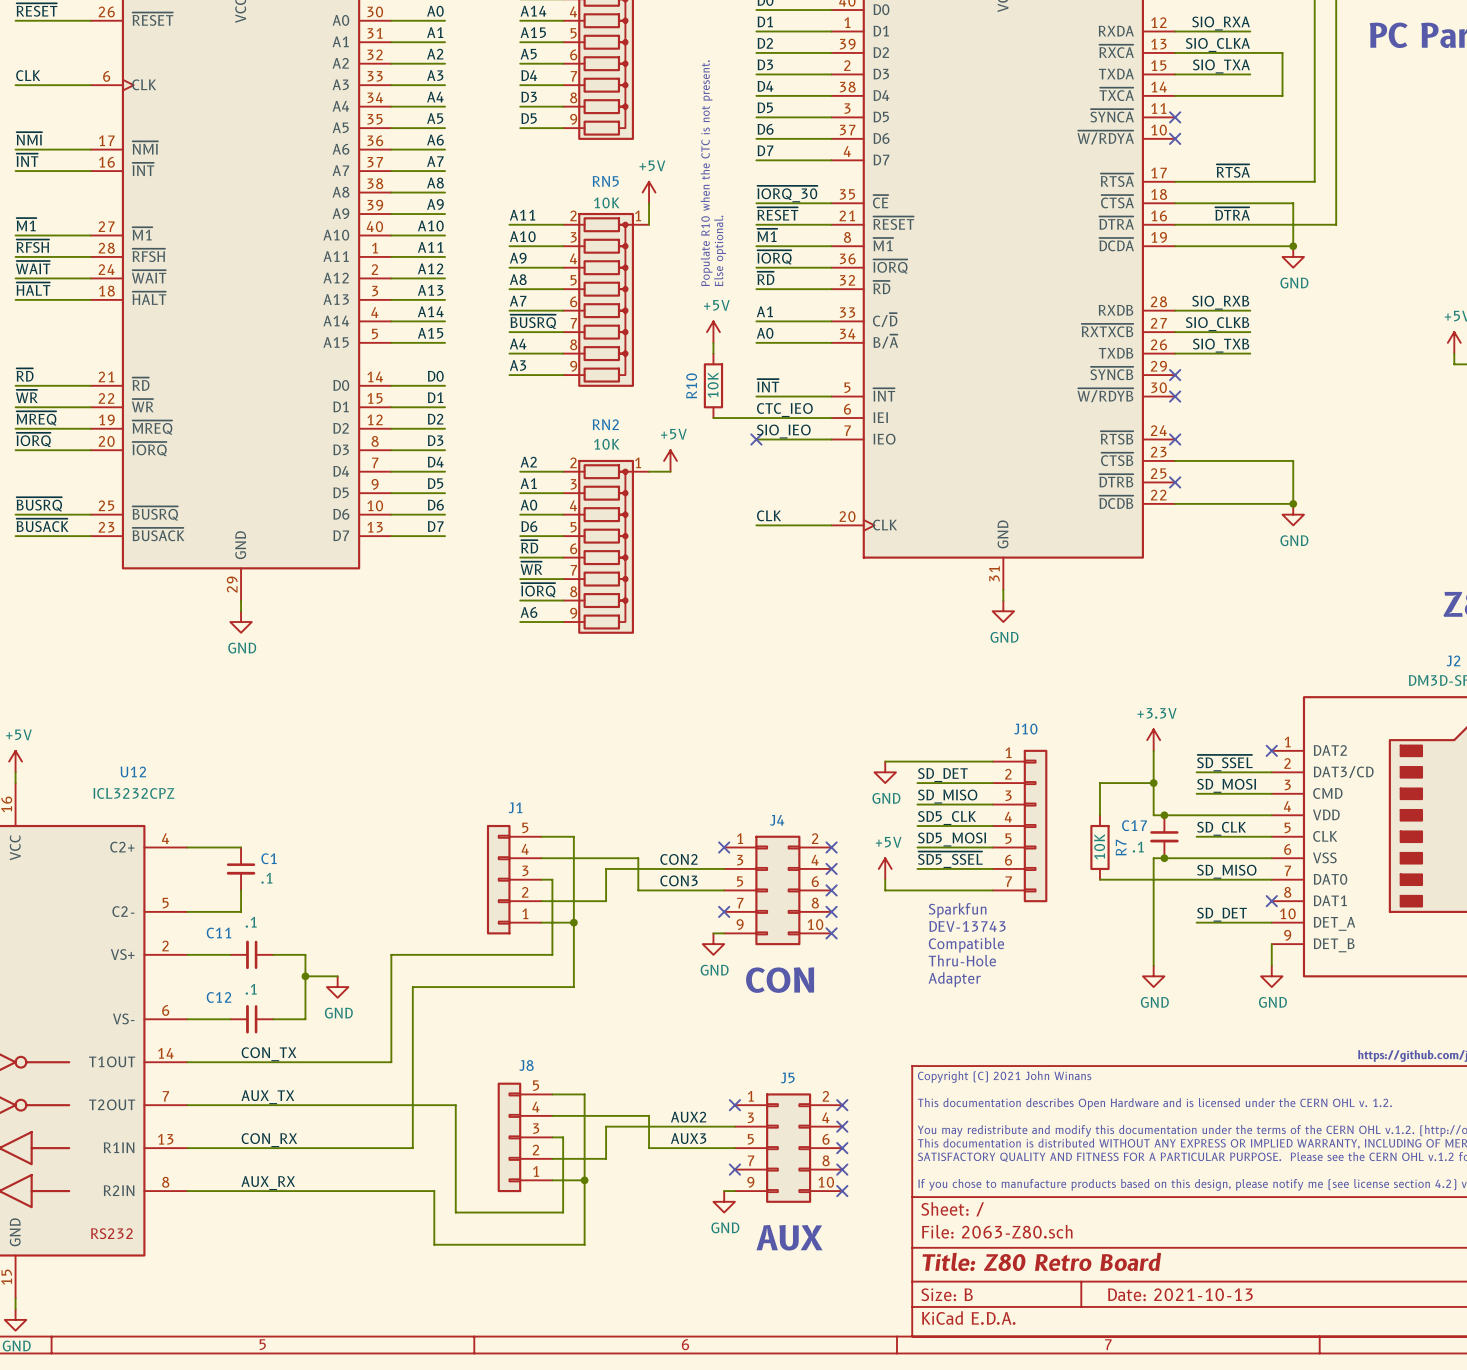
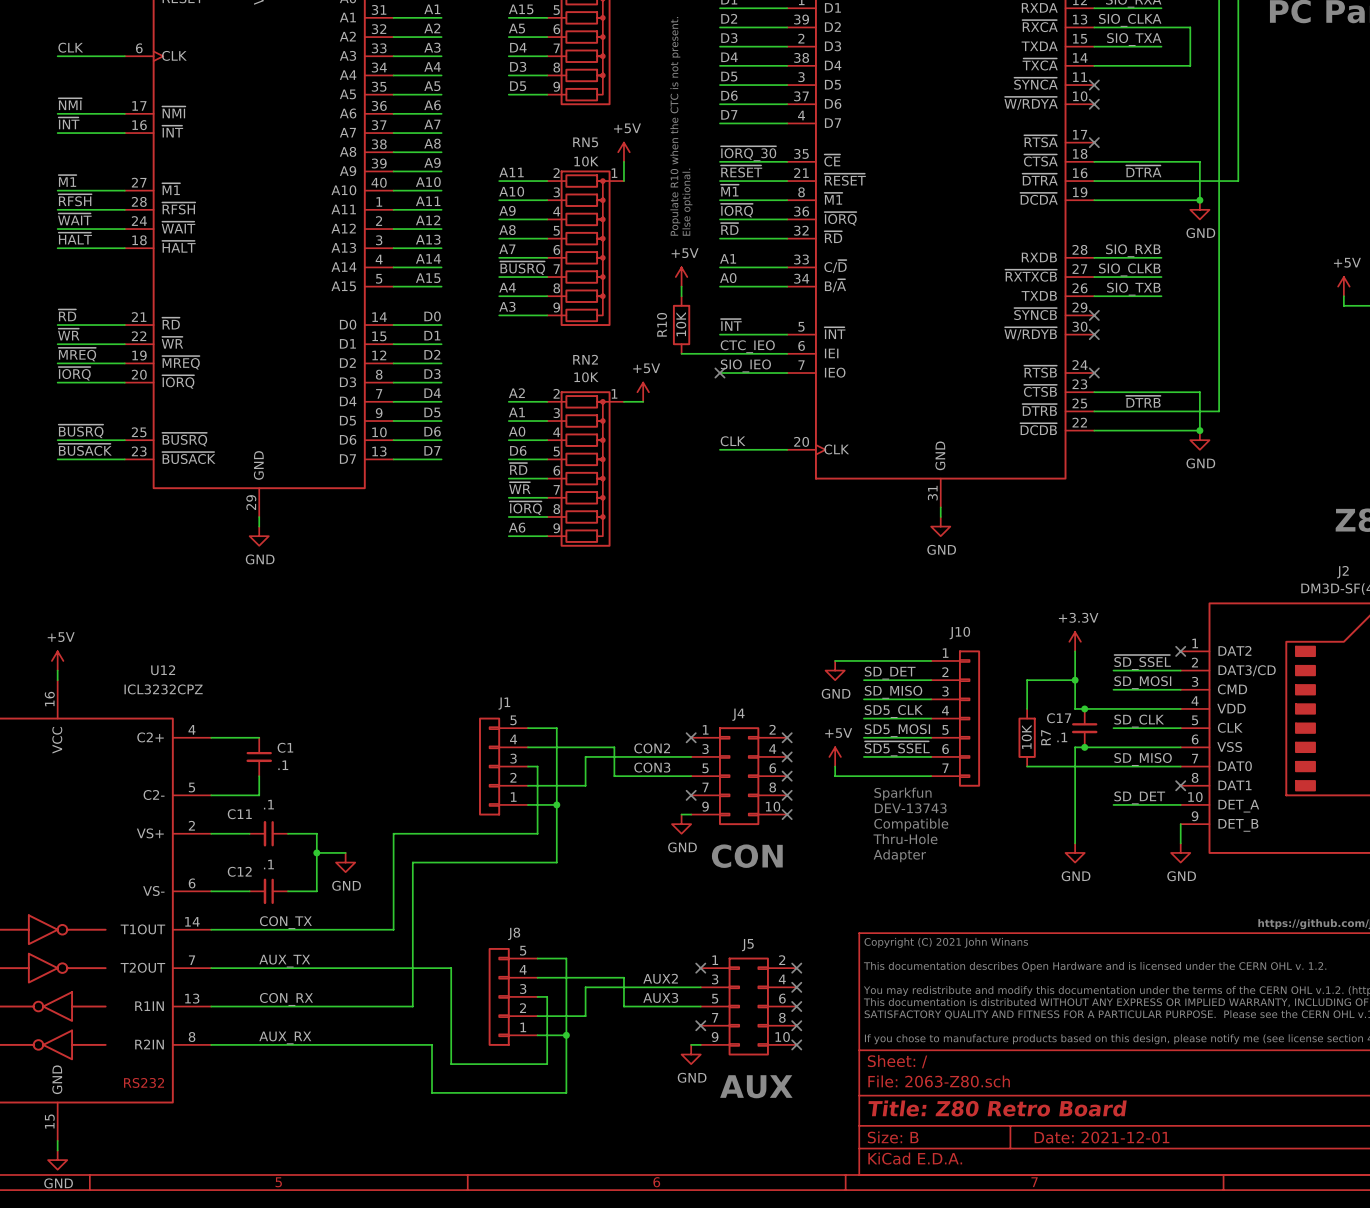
label: ~{RTSA} (1233, 171) -> none
wire: (1175, 181) (1314, 181) -> (1094, 411) (1219, 411) (1219, 142)
no-connect mark: none -> (1094, 142)
label: none -> ~{DTRB} (1143, 401)
no-connect mark: (1175, 482) -> none
title block: Date: 2021-10-13 (1180, 1294) -> Date: 2021-12-01 (1102, 1137)

